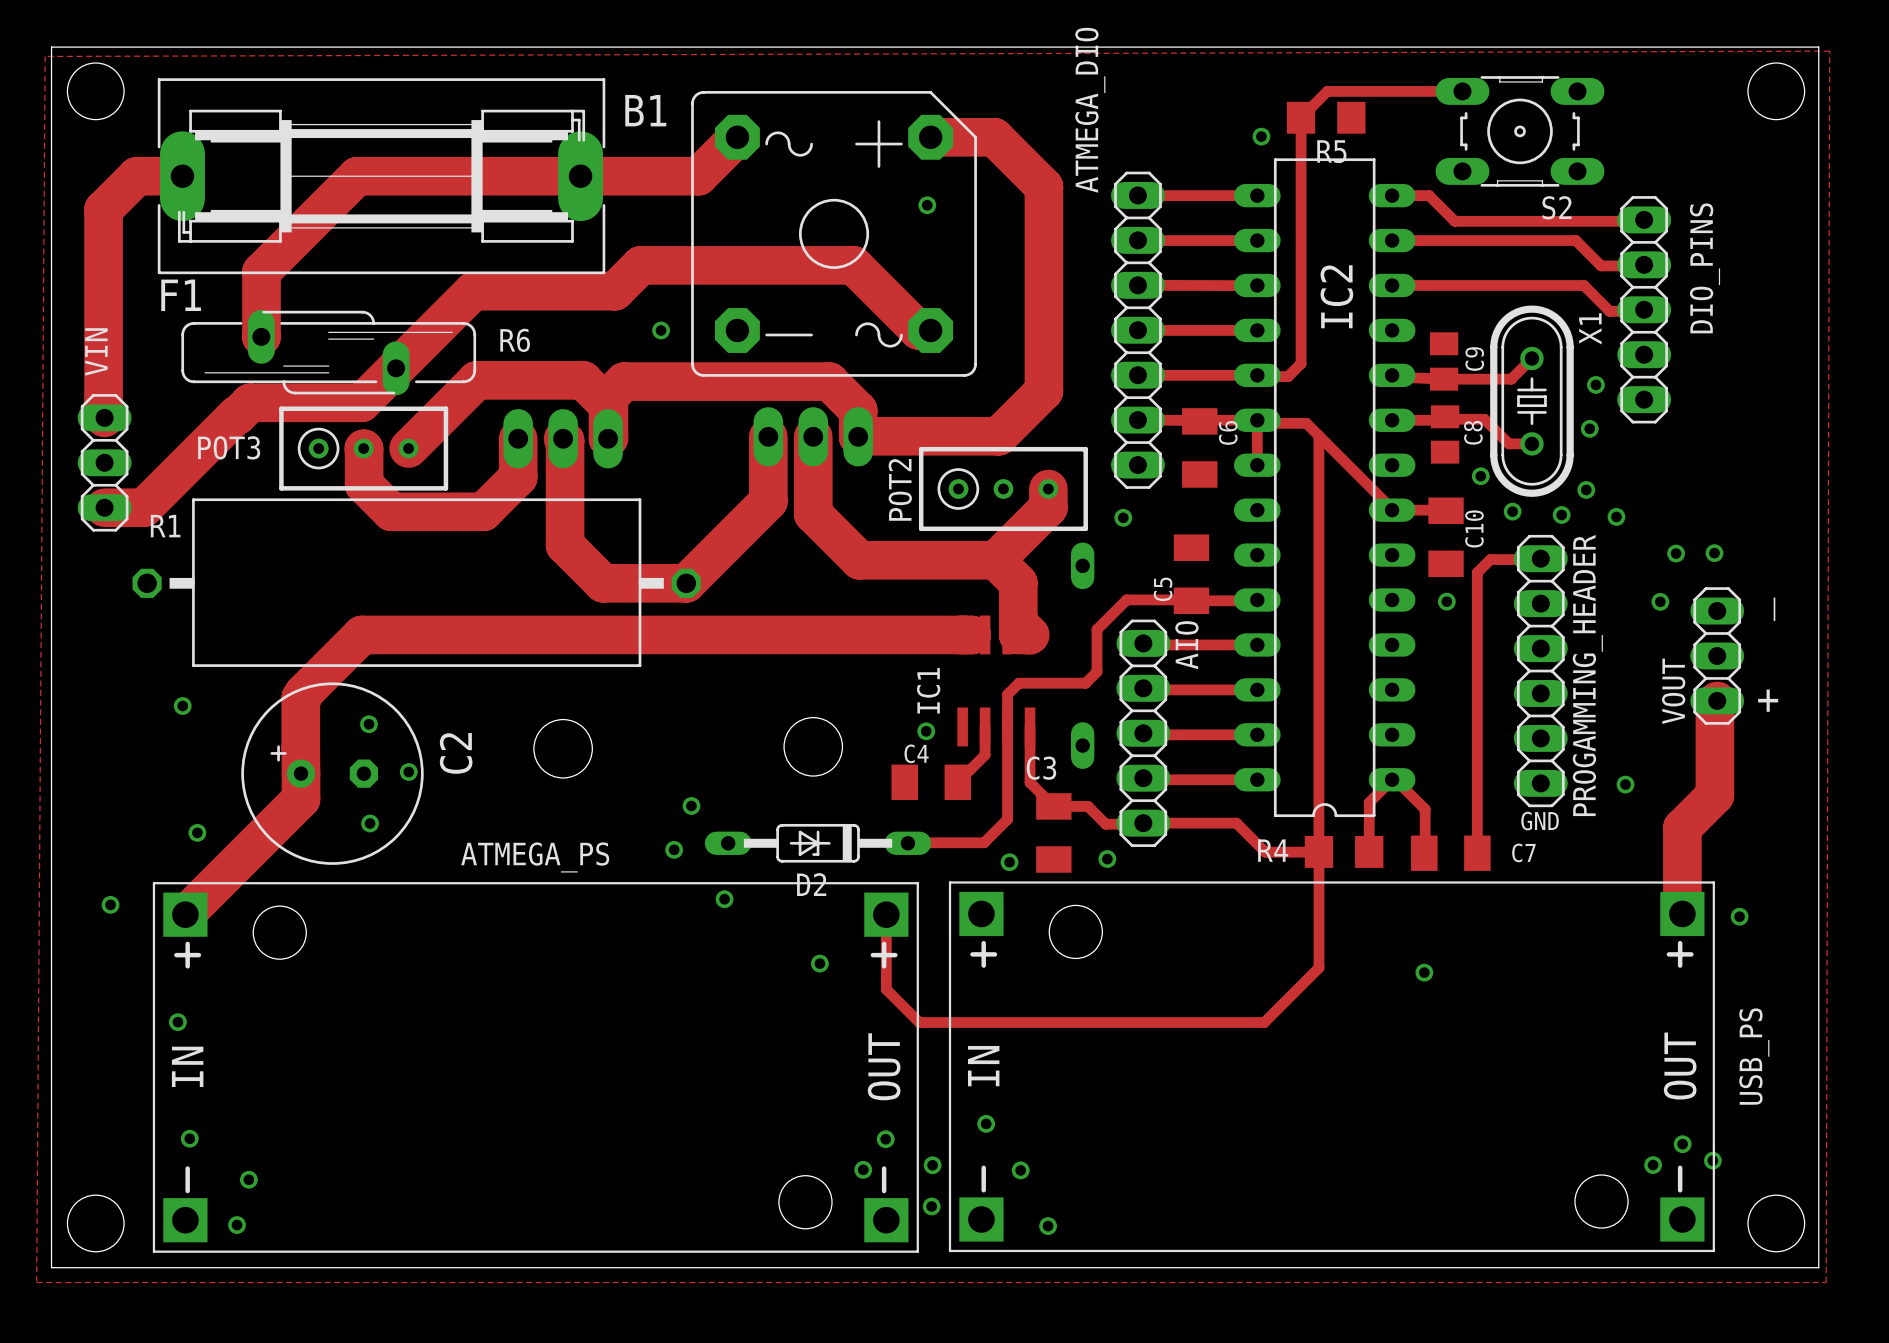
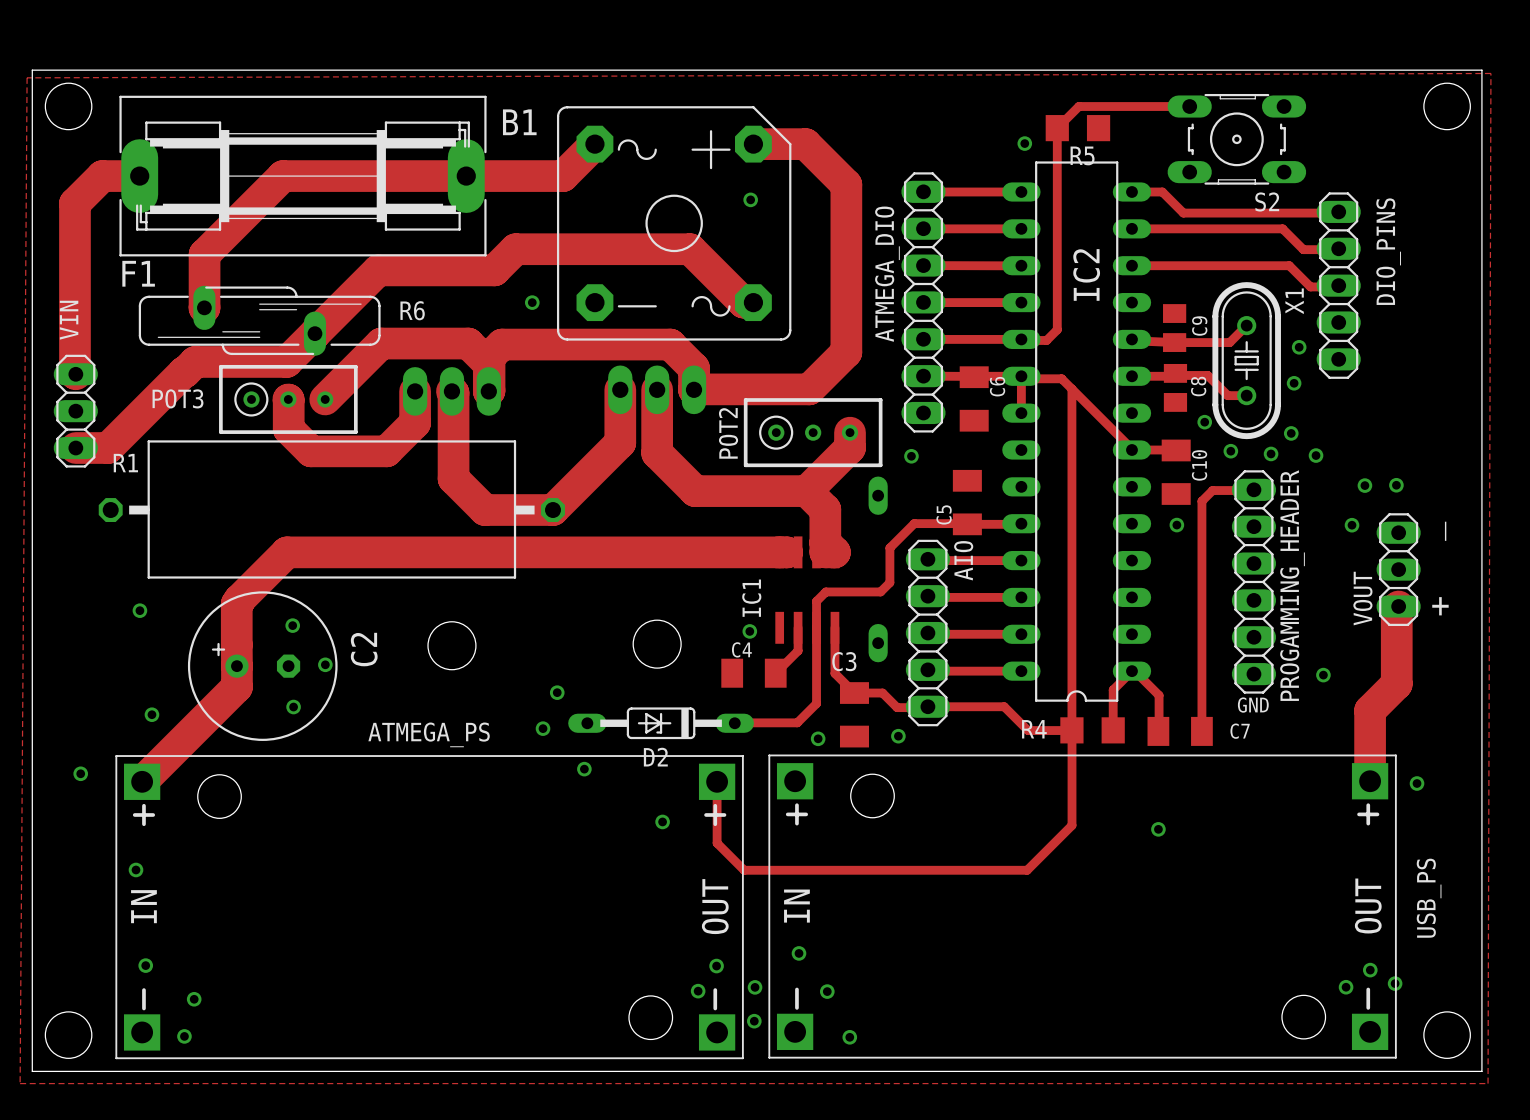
ATMEGA_DIO name position: ATMEGA_DIO (1090, 110) -> ATMEGA_DIO (887, 274)

